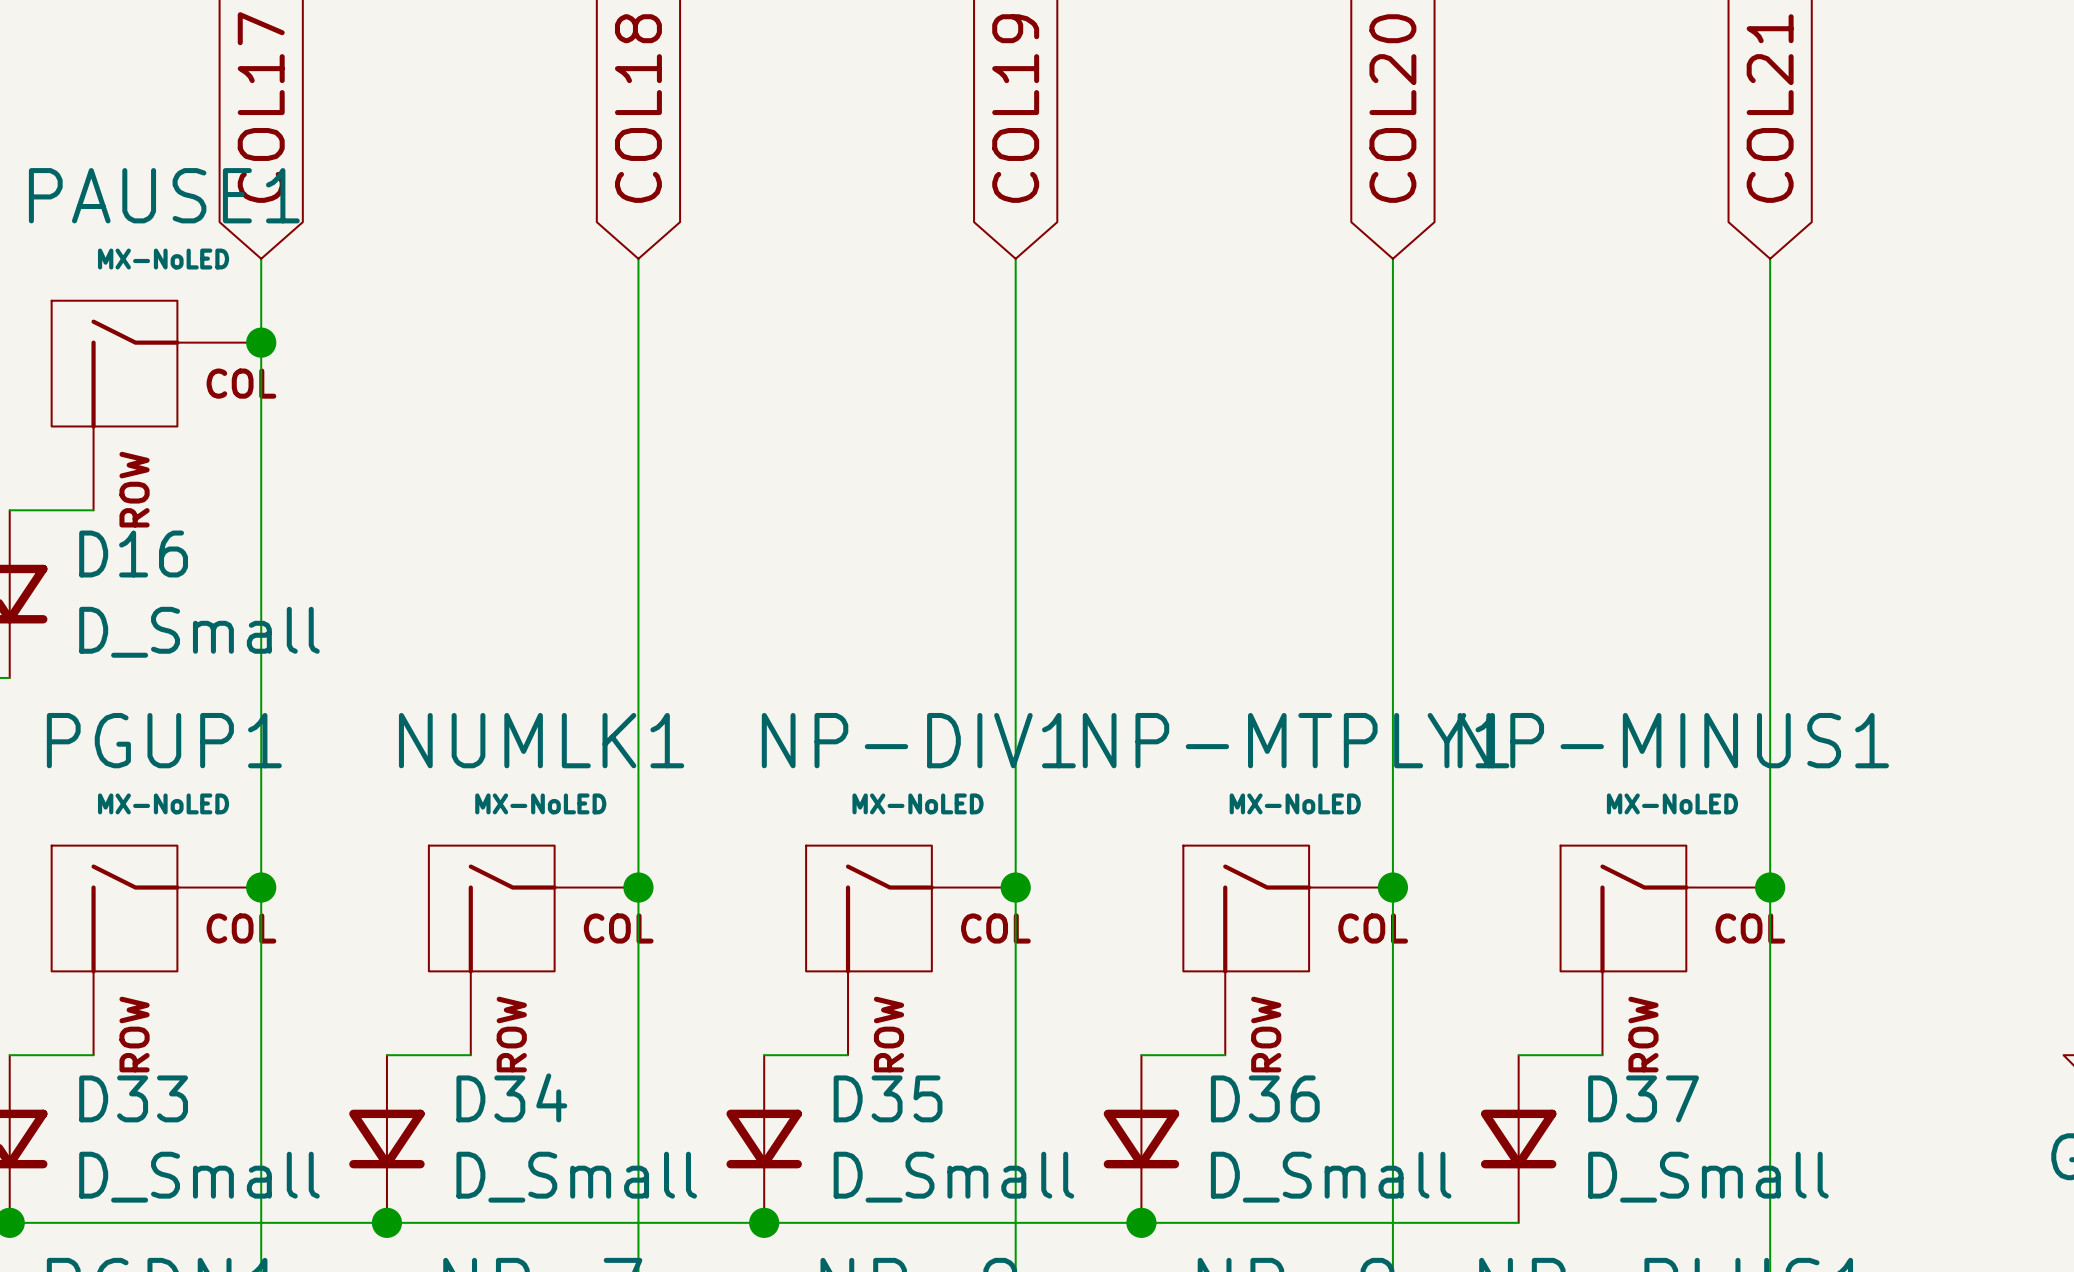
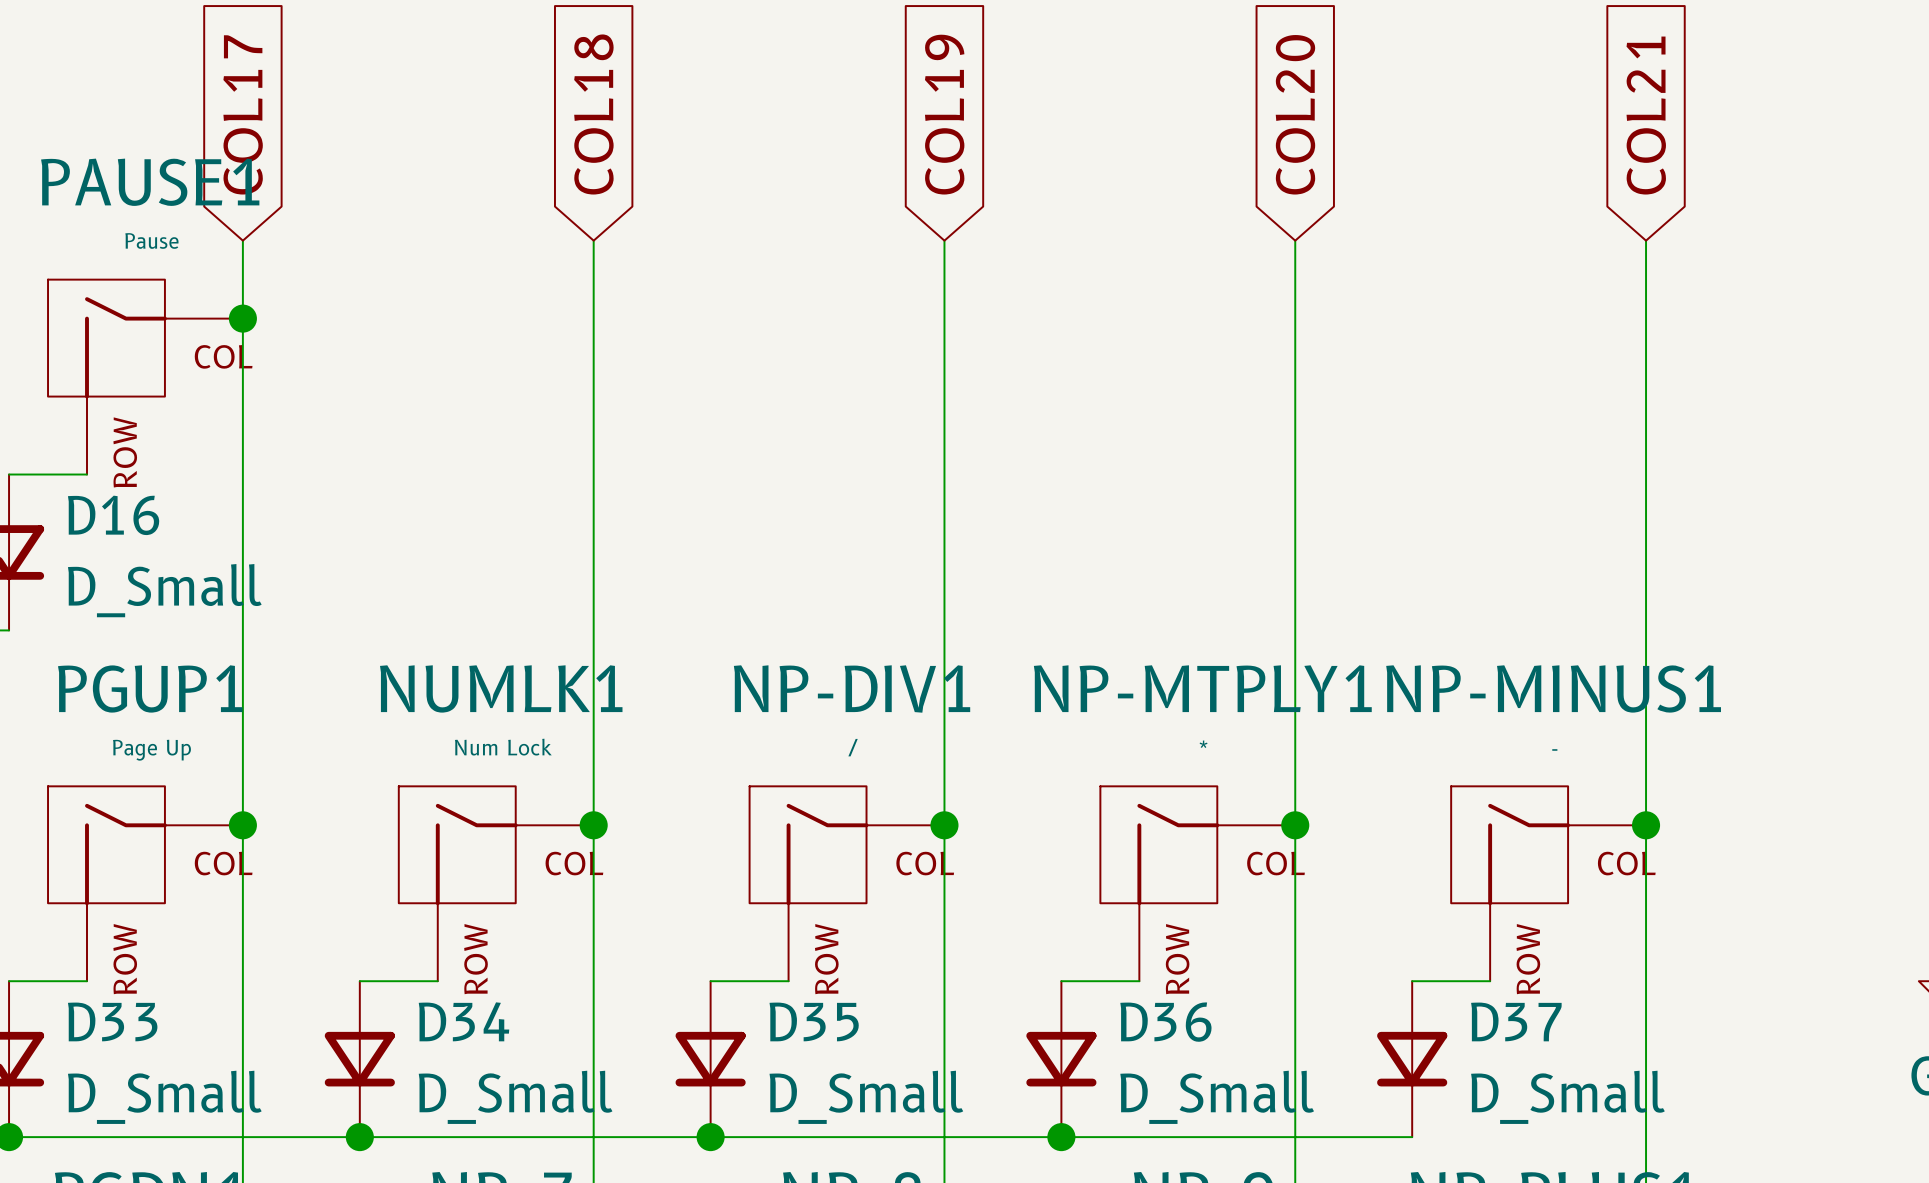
PAUSE1 value: MX-NoLED (163, 259) -> Pause (151, 240)
PGUP1 value: MX-NoLED (163, 803) -> Page Up (151, 750)
NUMLK1 value: MX-NoLED (540, 803) -> Num Lock (503, 747)
NP-DIV1 value: MX-NoLED (918, 803) -> / (853, 747)
NP-MTPLY1 value: MX-NoLED (1295, 803) -> * (1203, 744)
NP-MINUS1 value: MX-NoLED (1672, 803) -> - (1554, 749)

